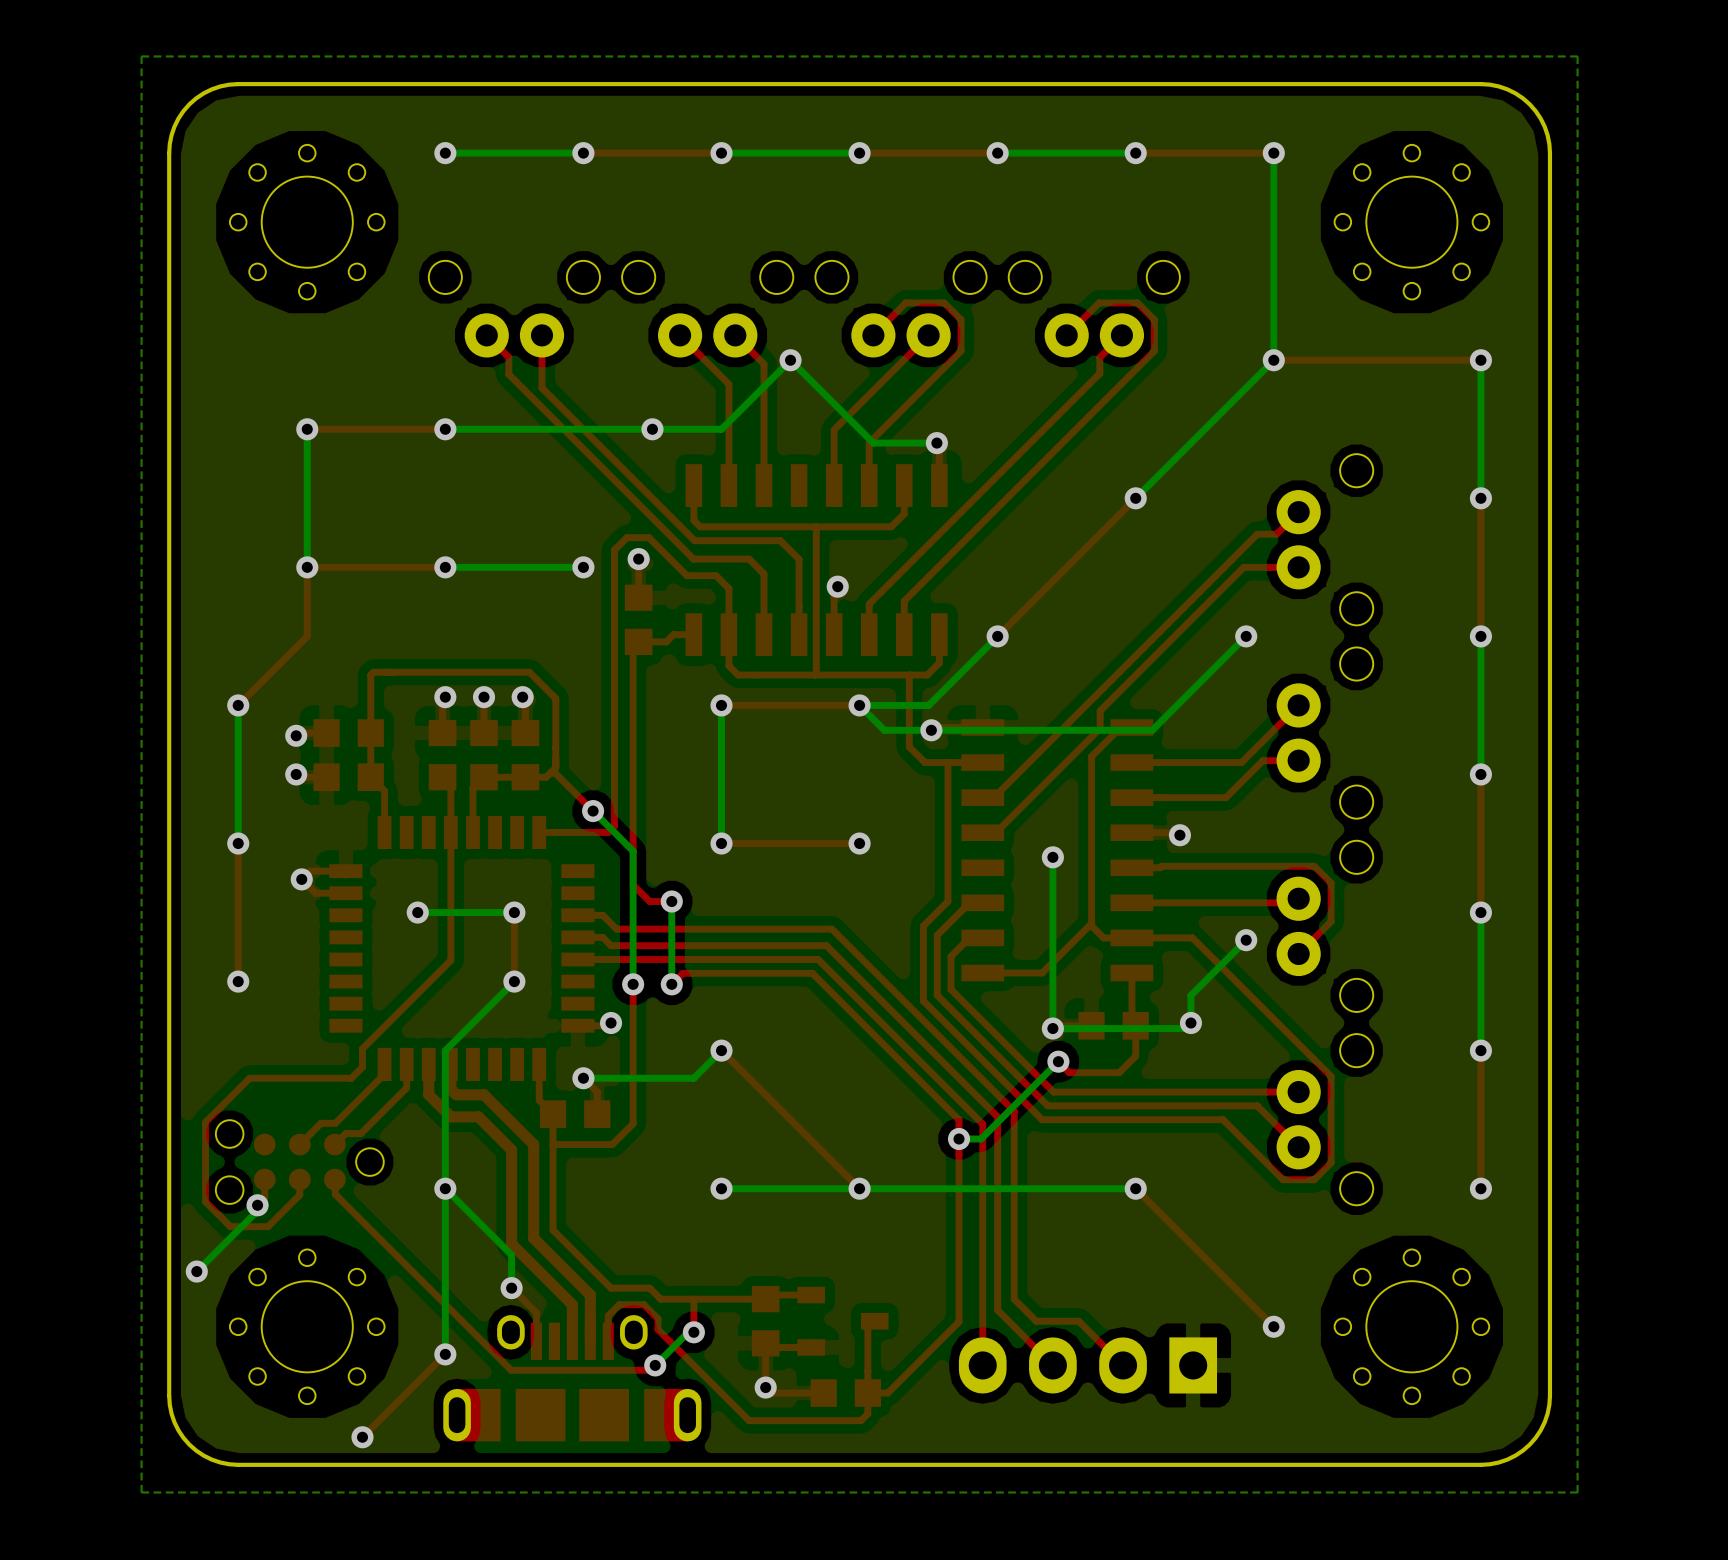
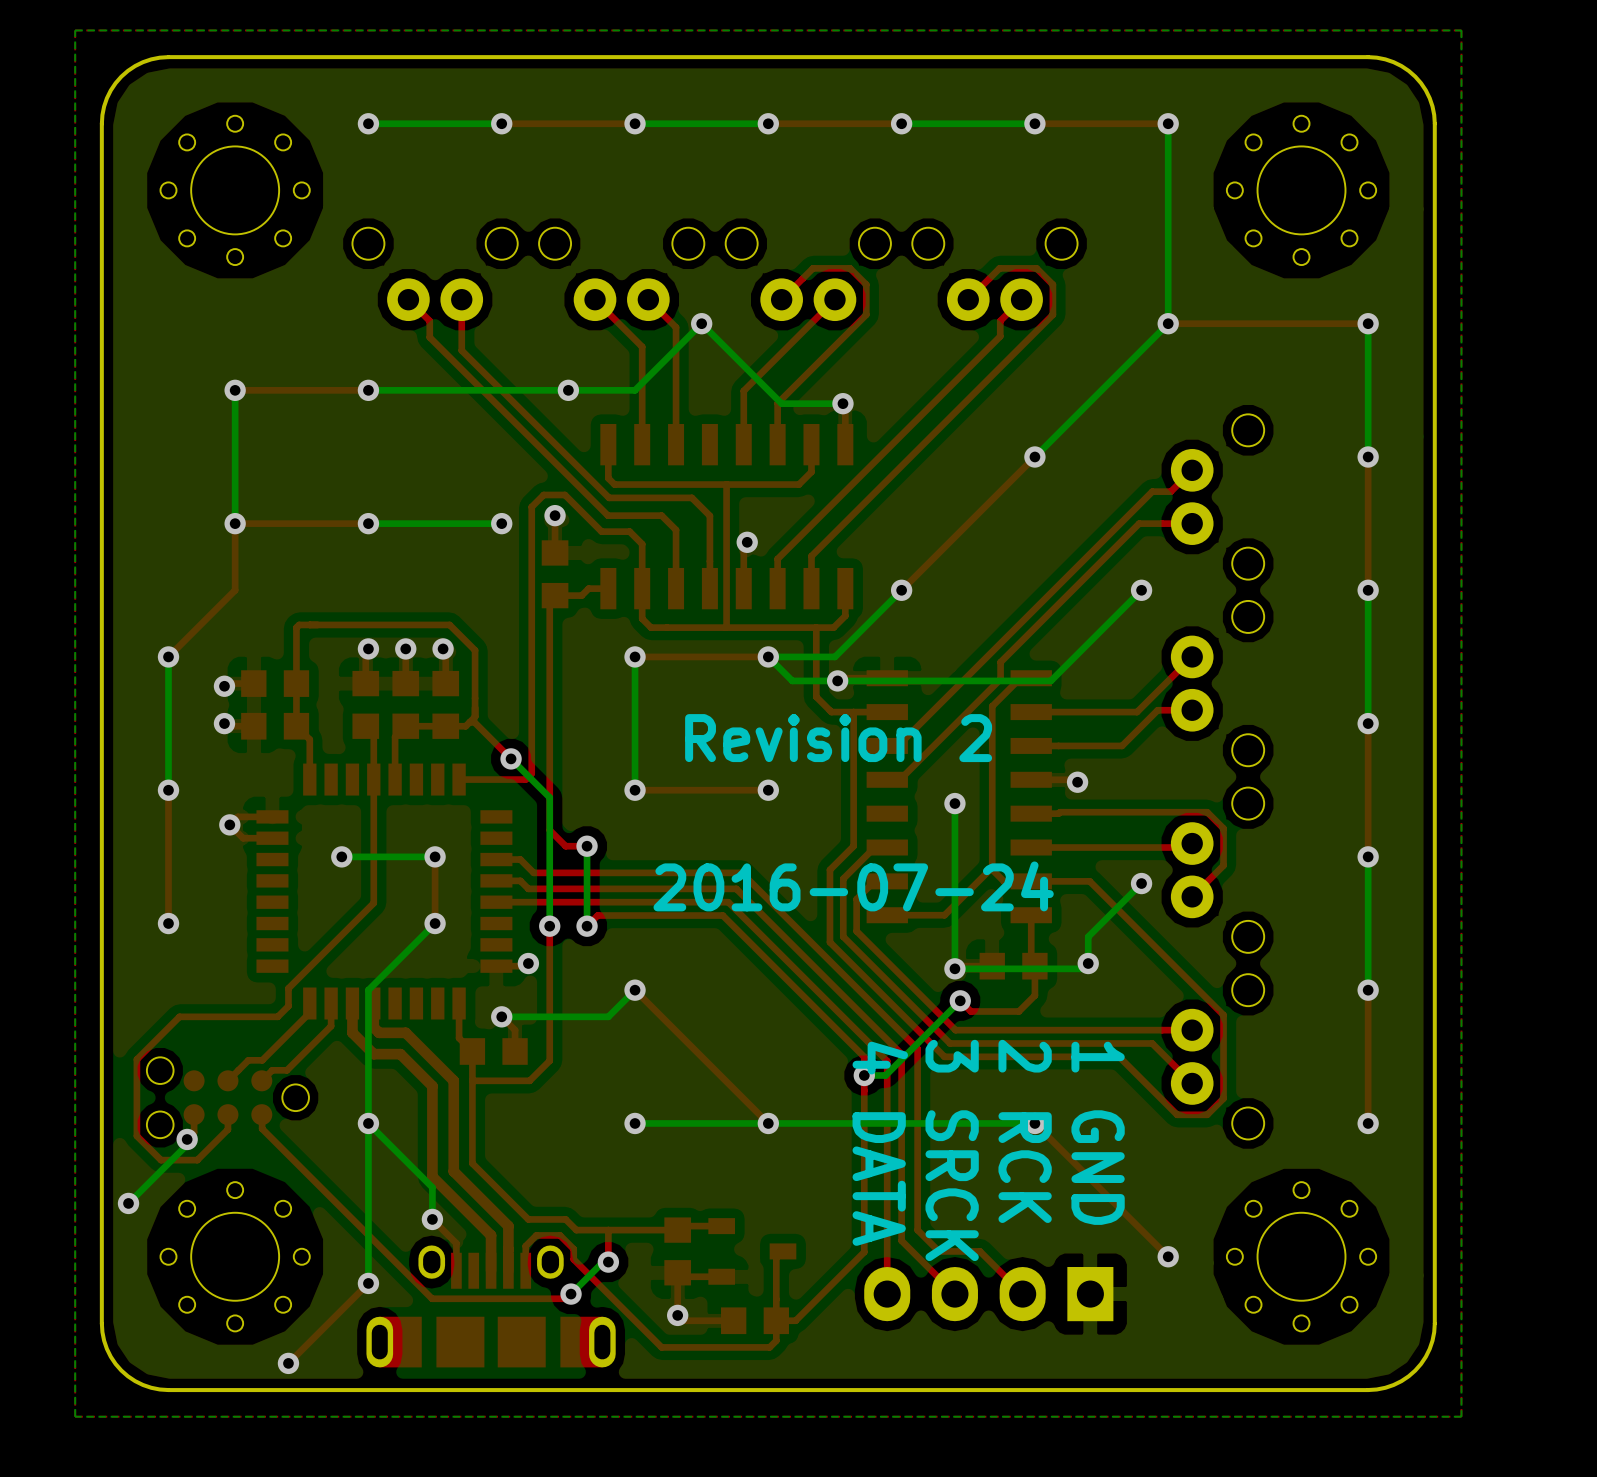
text: none -> Revision 2 (838, 738)
text: none -> 2016-07-24 (853, 886)
text: none -> 2 RCK (1025, 1131)
text: none -> 1 GND (1098, 1133)
text: none -> 4 DATA (880, 1143)
text: none -> 3 SRCK (952, 1150)

